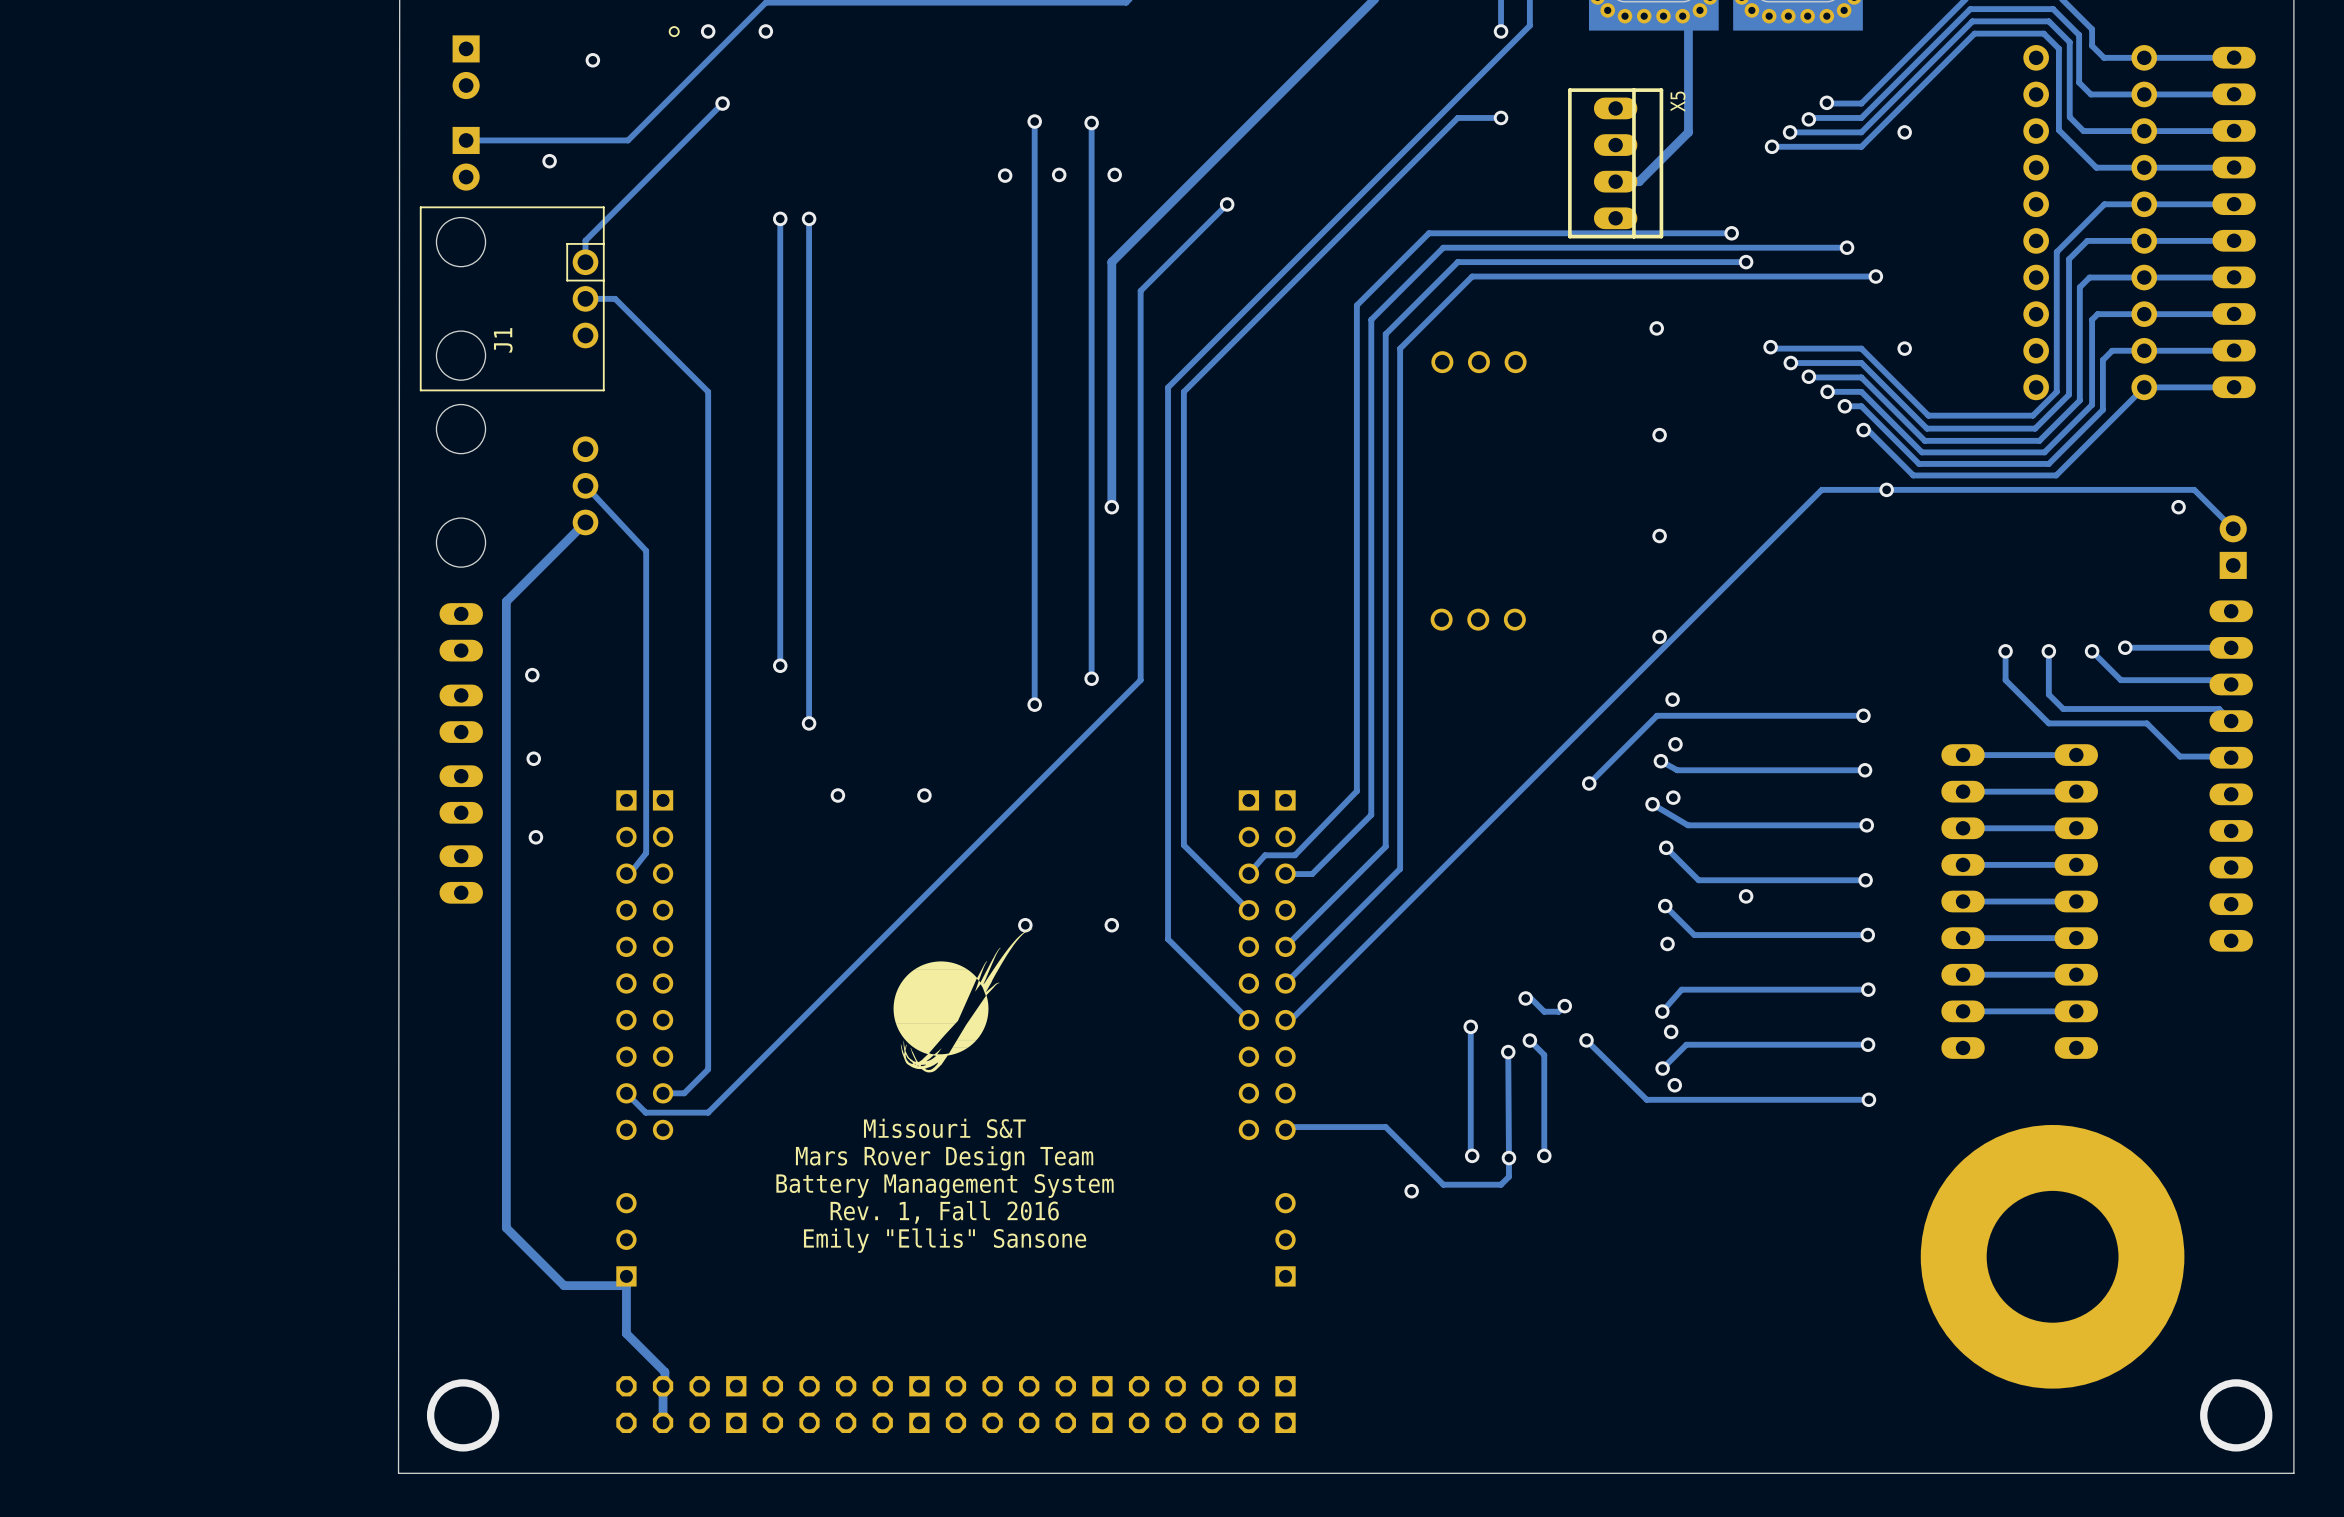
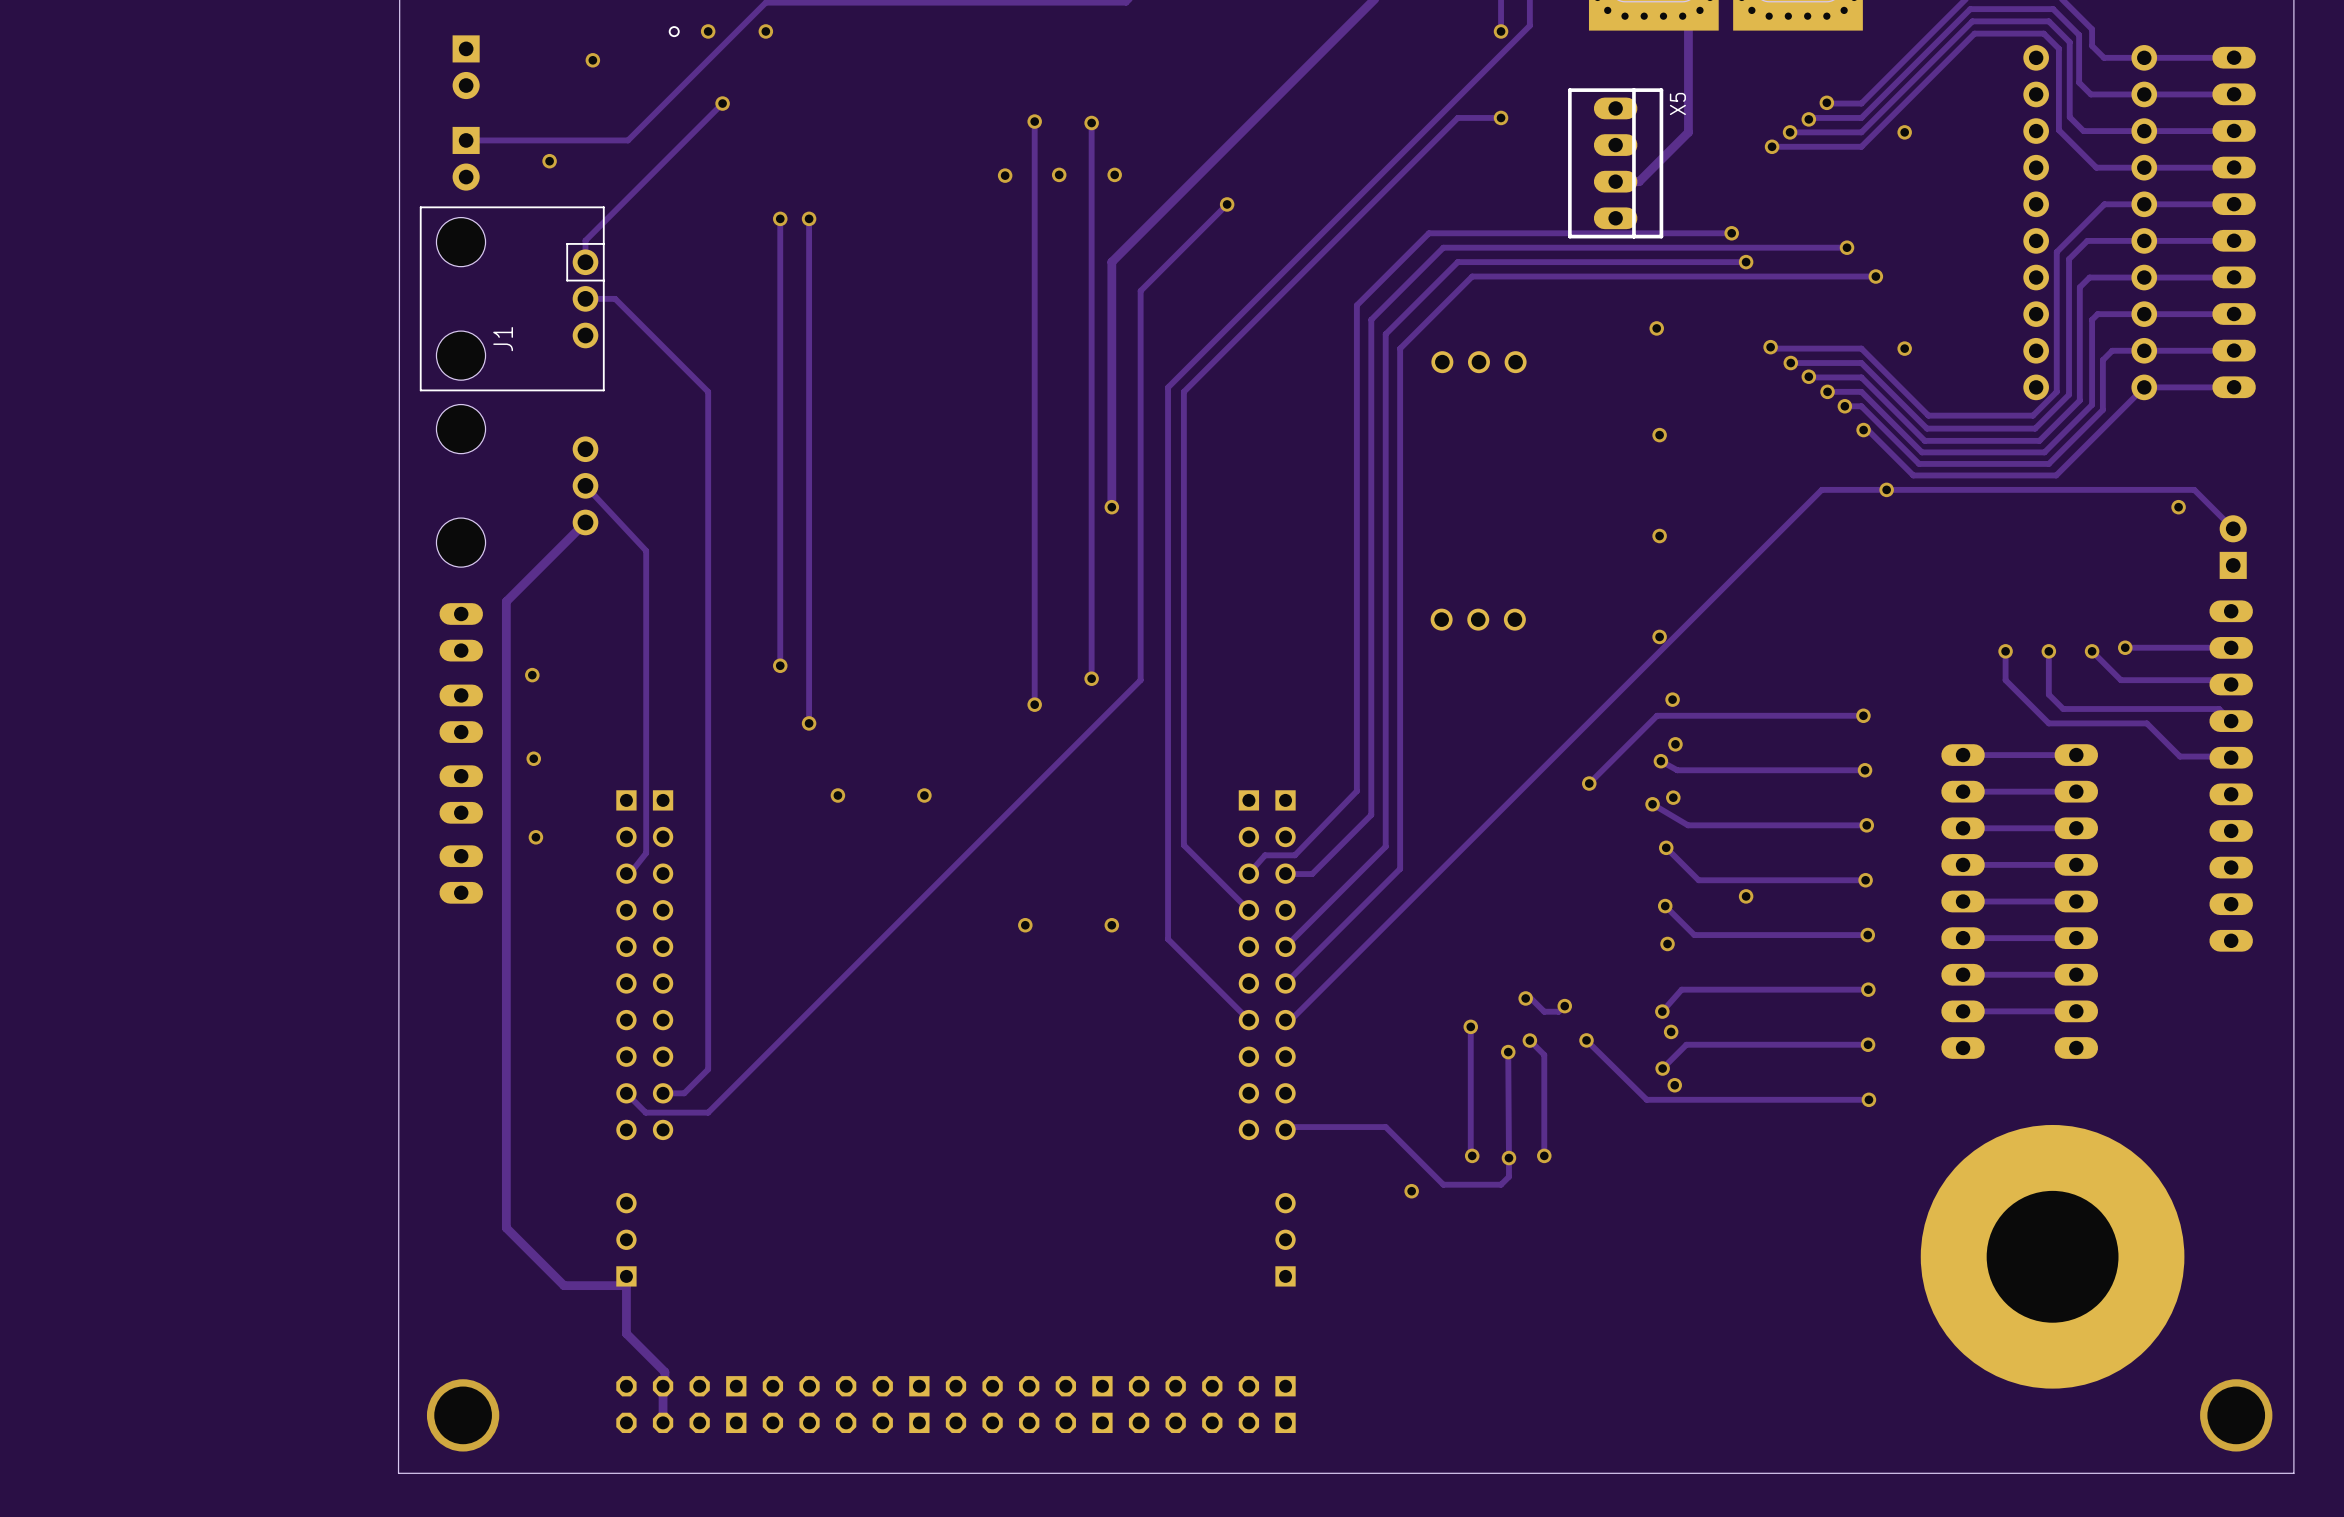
drawing: [893, 928, 1033, 1073] -> none
text: Missouri S&T (944, 1128) -> none
text: Mars Rover Design Team (944, 1158) -> none
text: Battery Management System (945, 1186) -> none
text: Rev. 1, Fall 2016 (944, 1212) -> none
text: Emily "Ellis" Sansone (945, 1240) -> none

